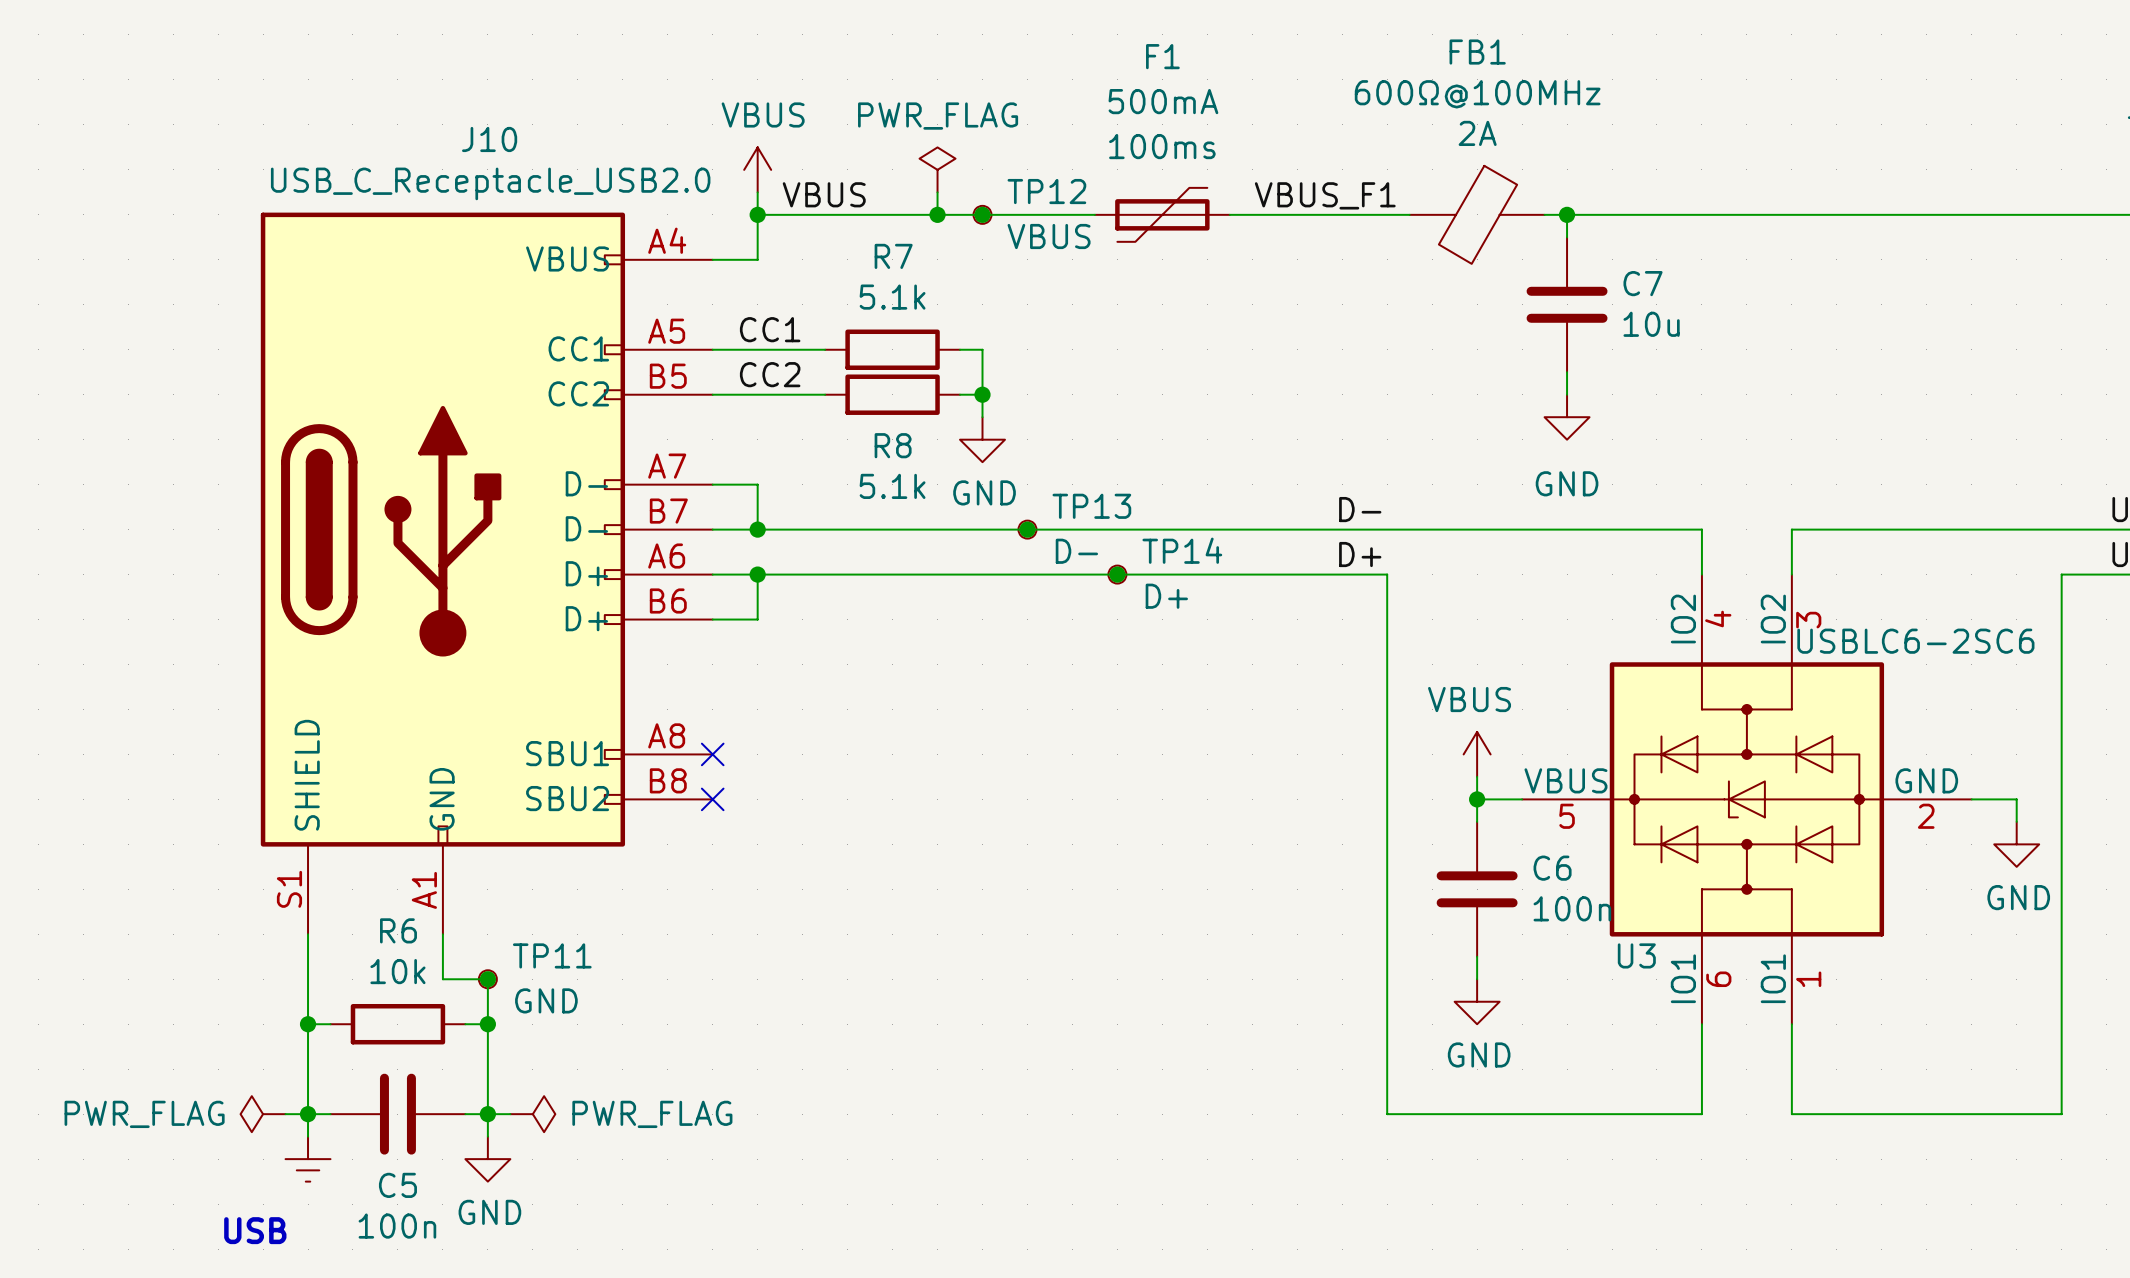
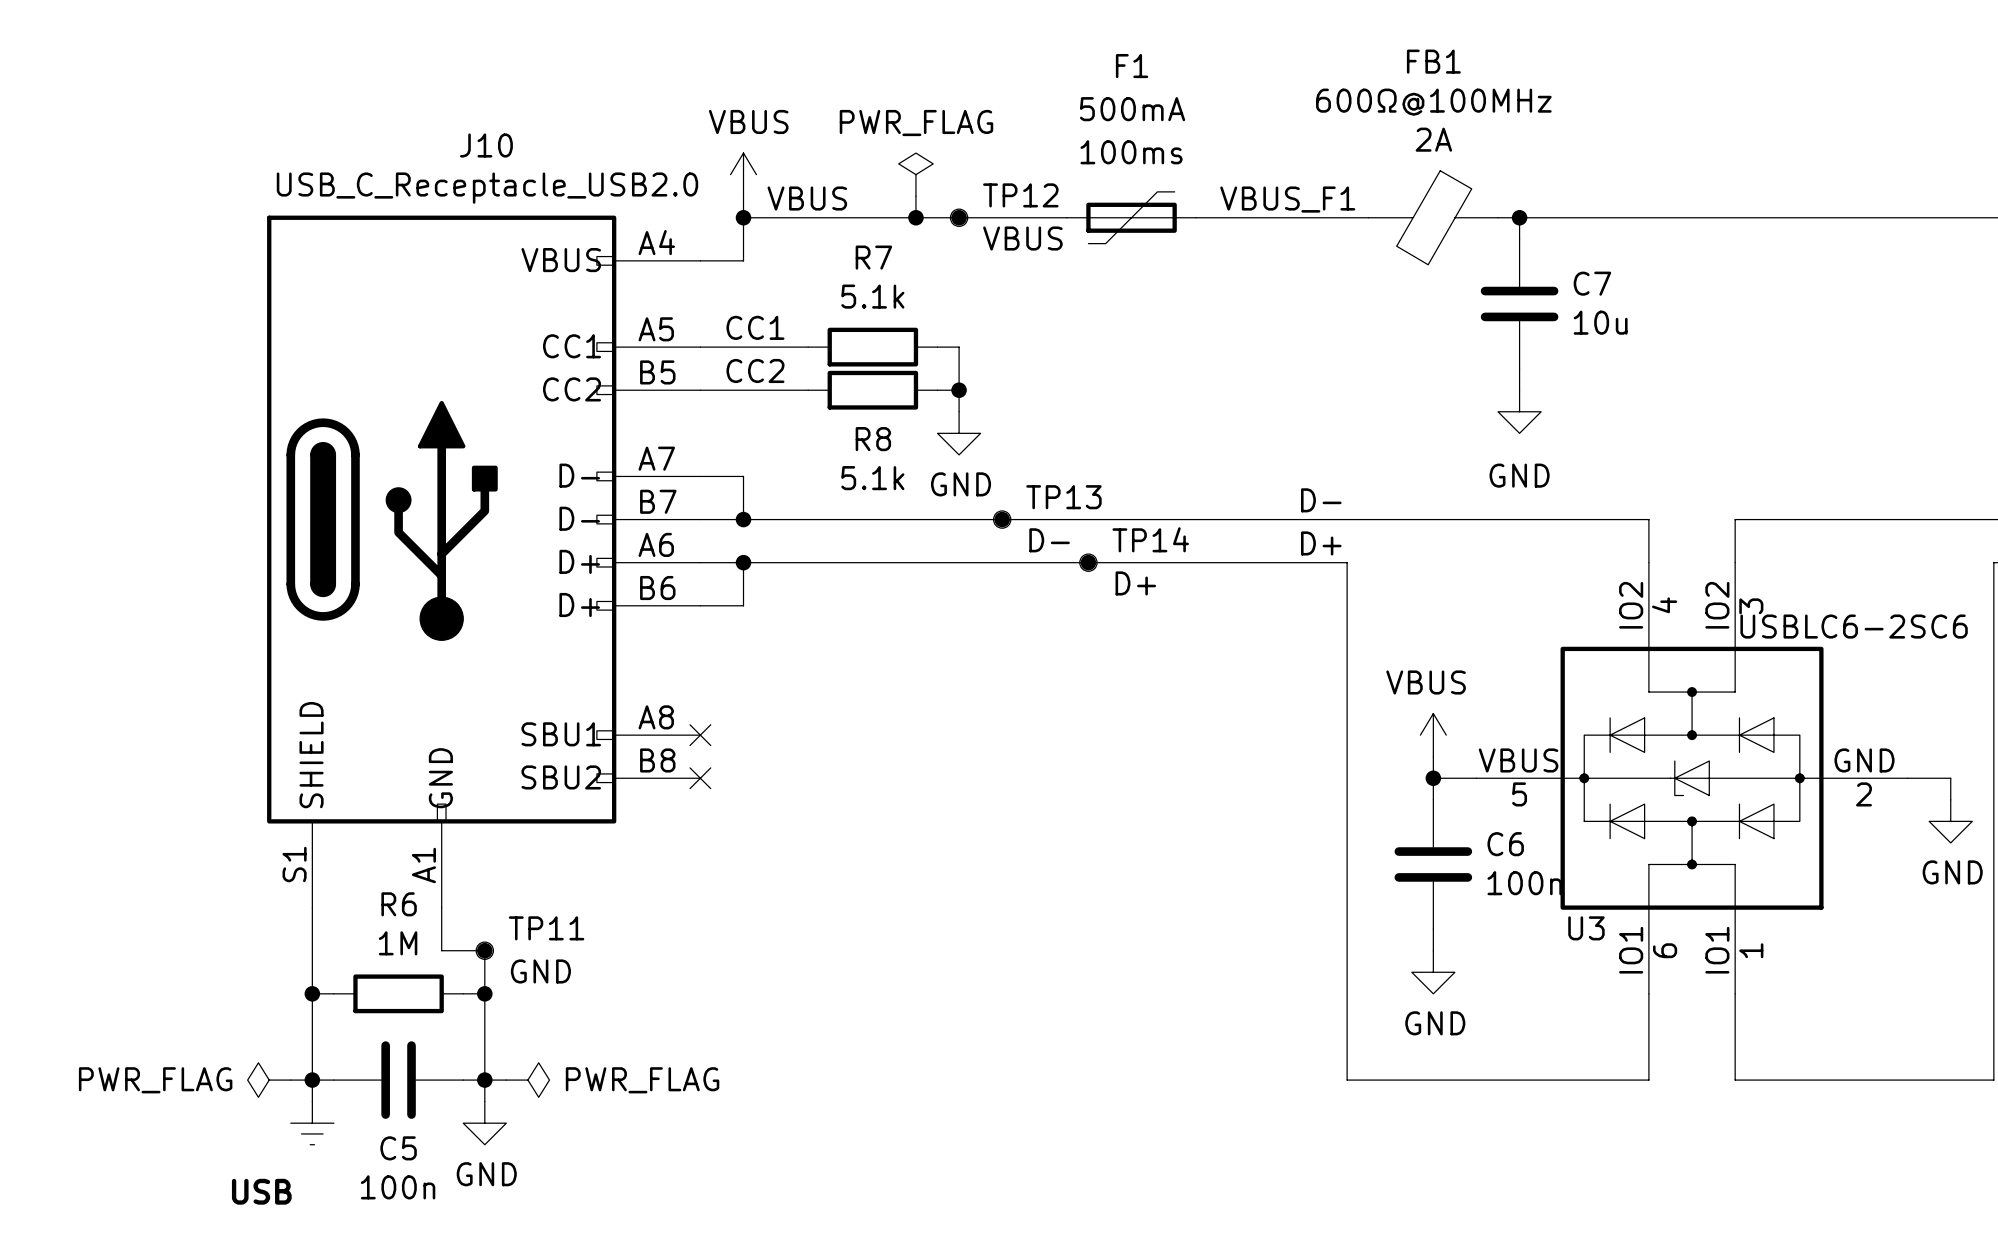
R6 value: 10k (397, 971) -> 1M (398, 943)

